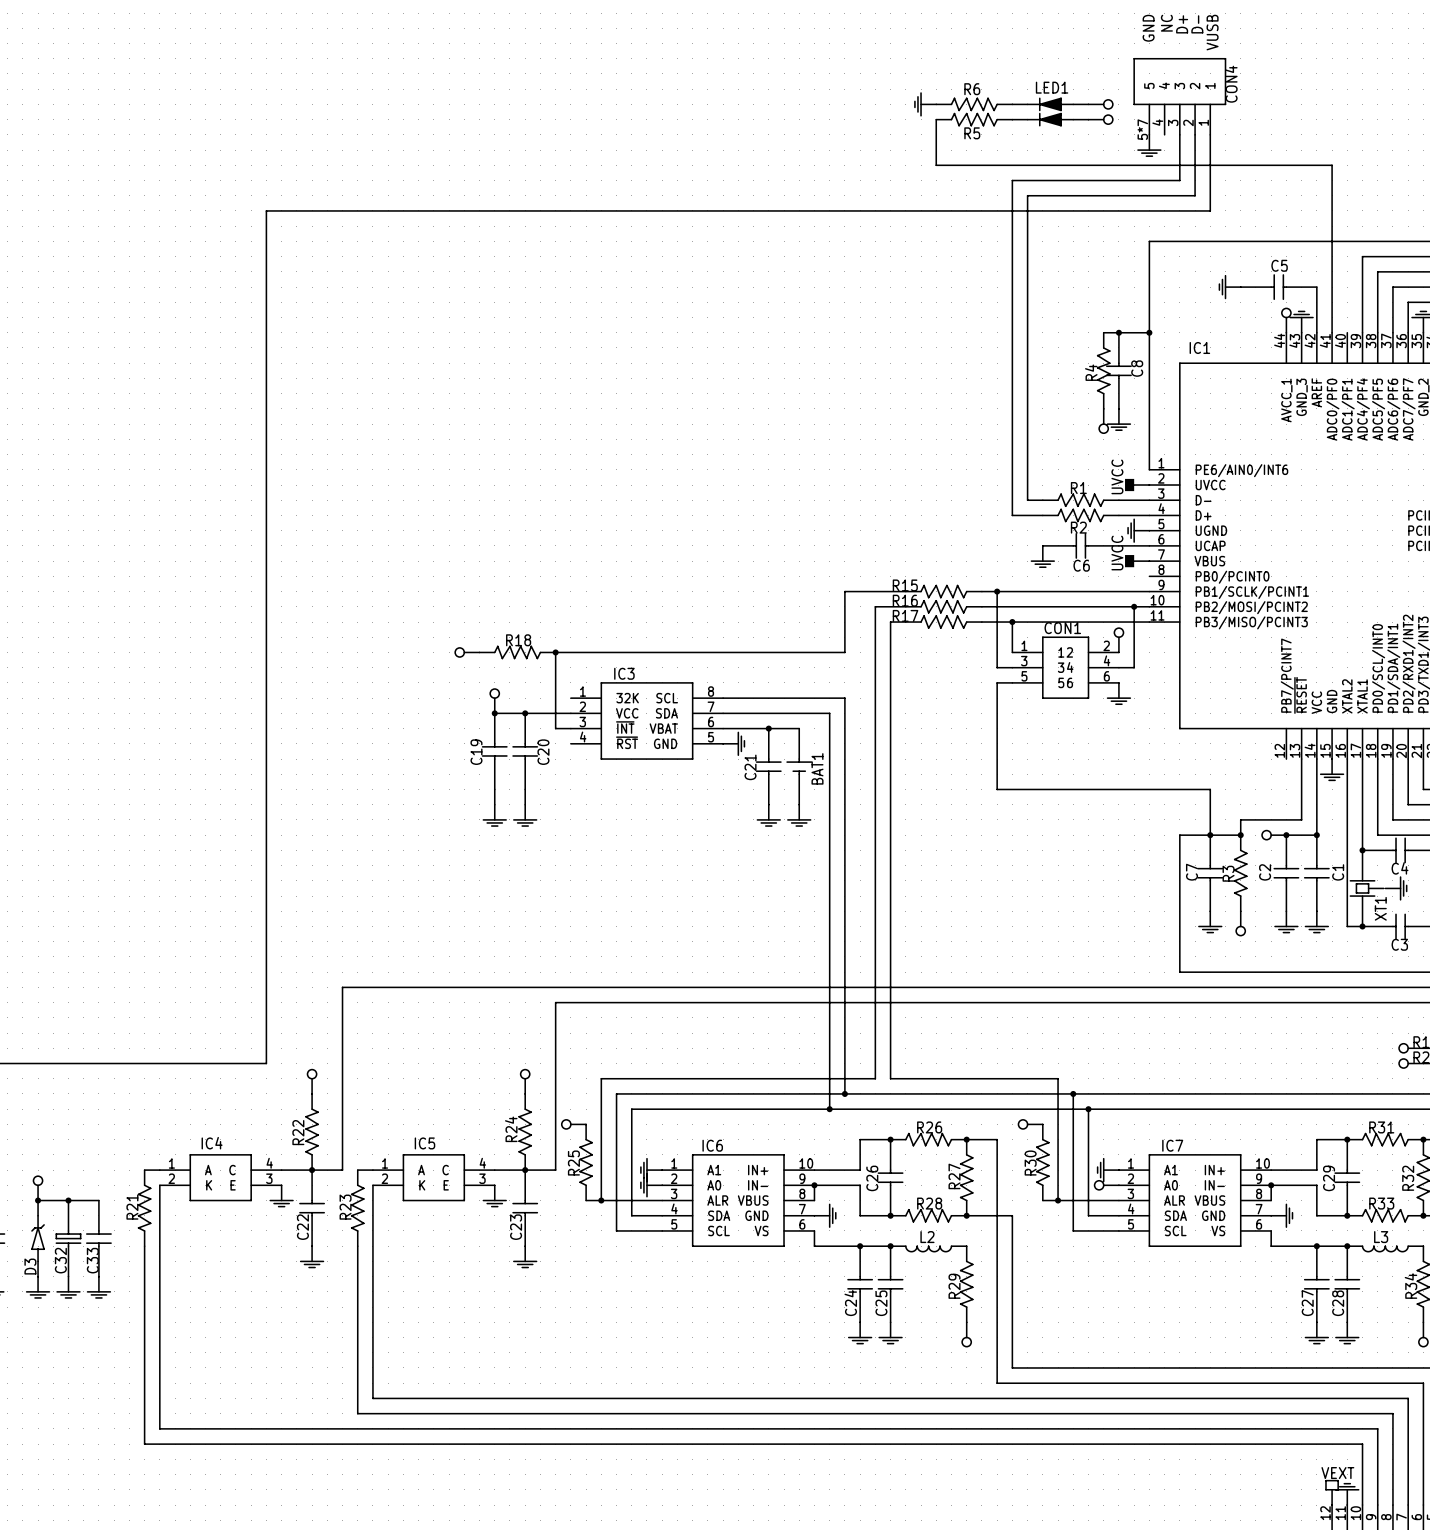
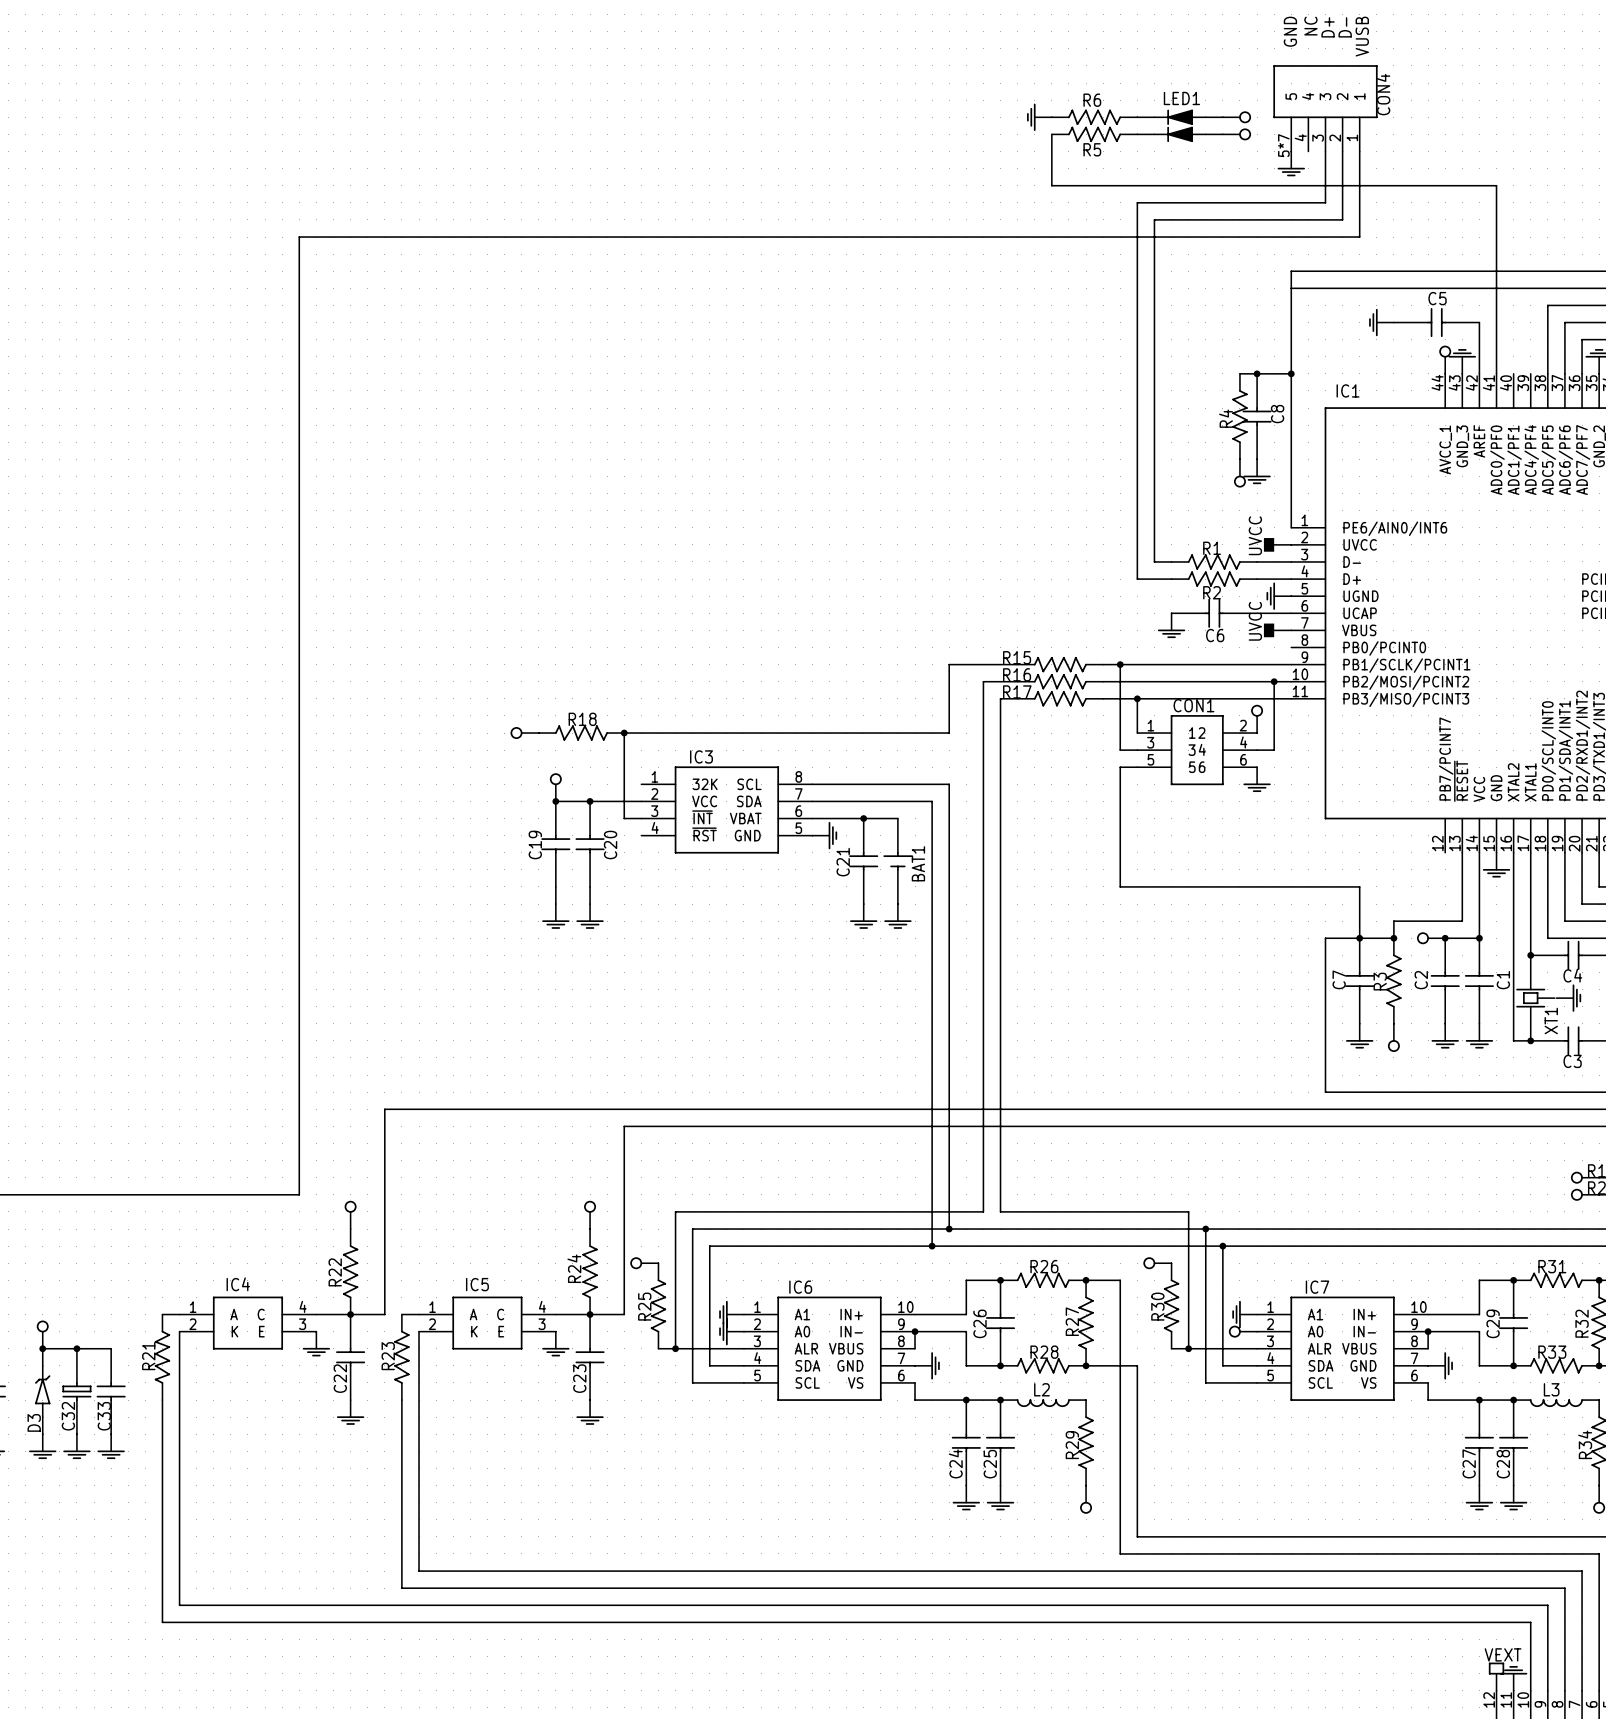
wire: (1362, 256) (1362, 332) -> (1530, 288) (1291, 288)

